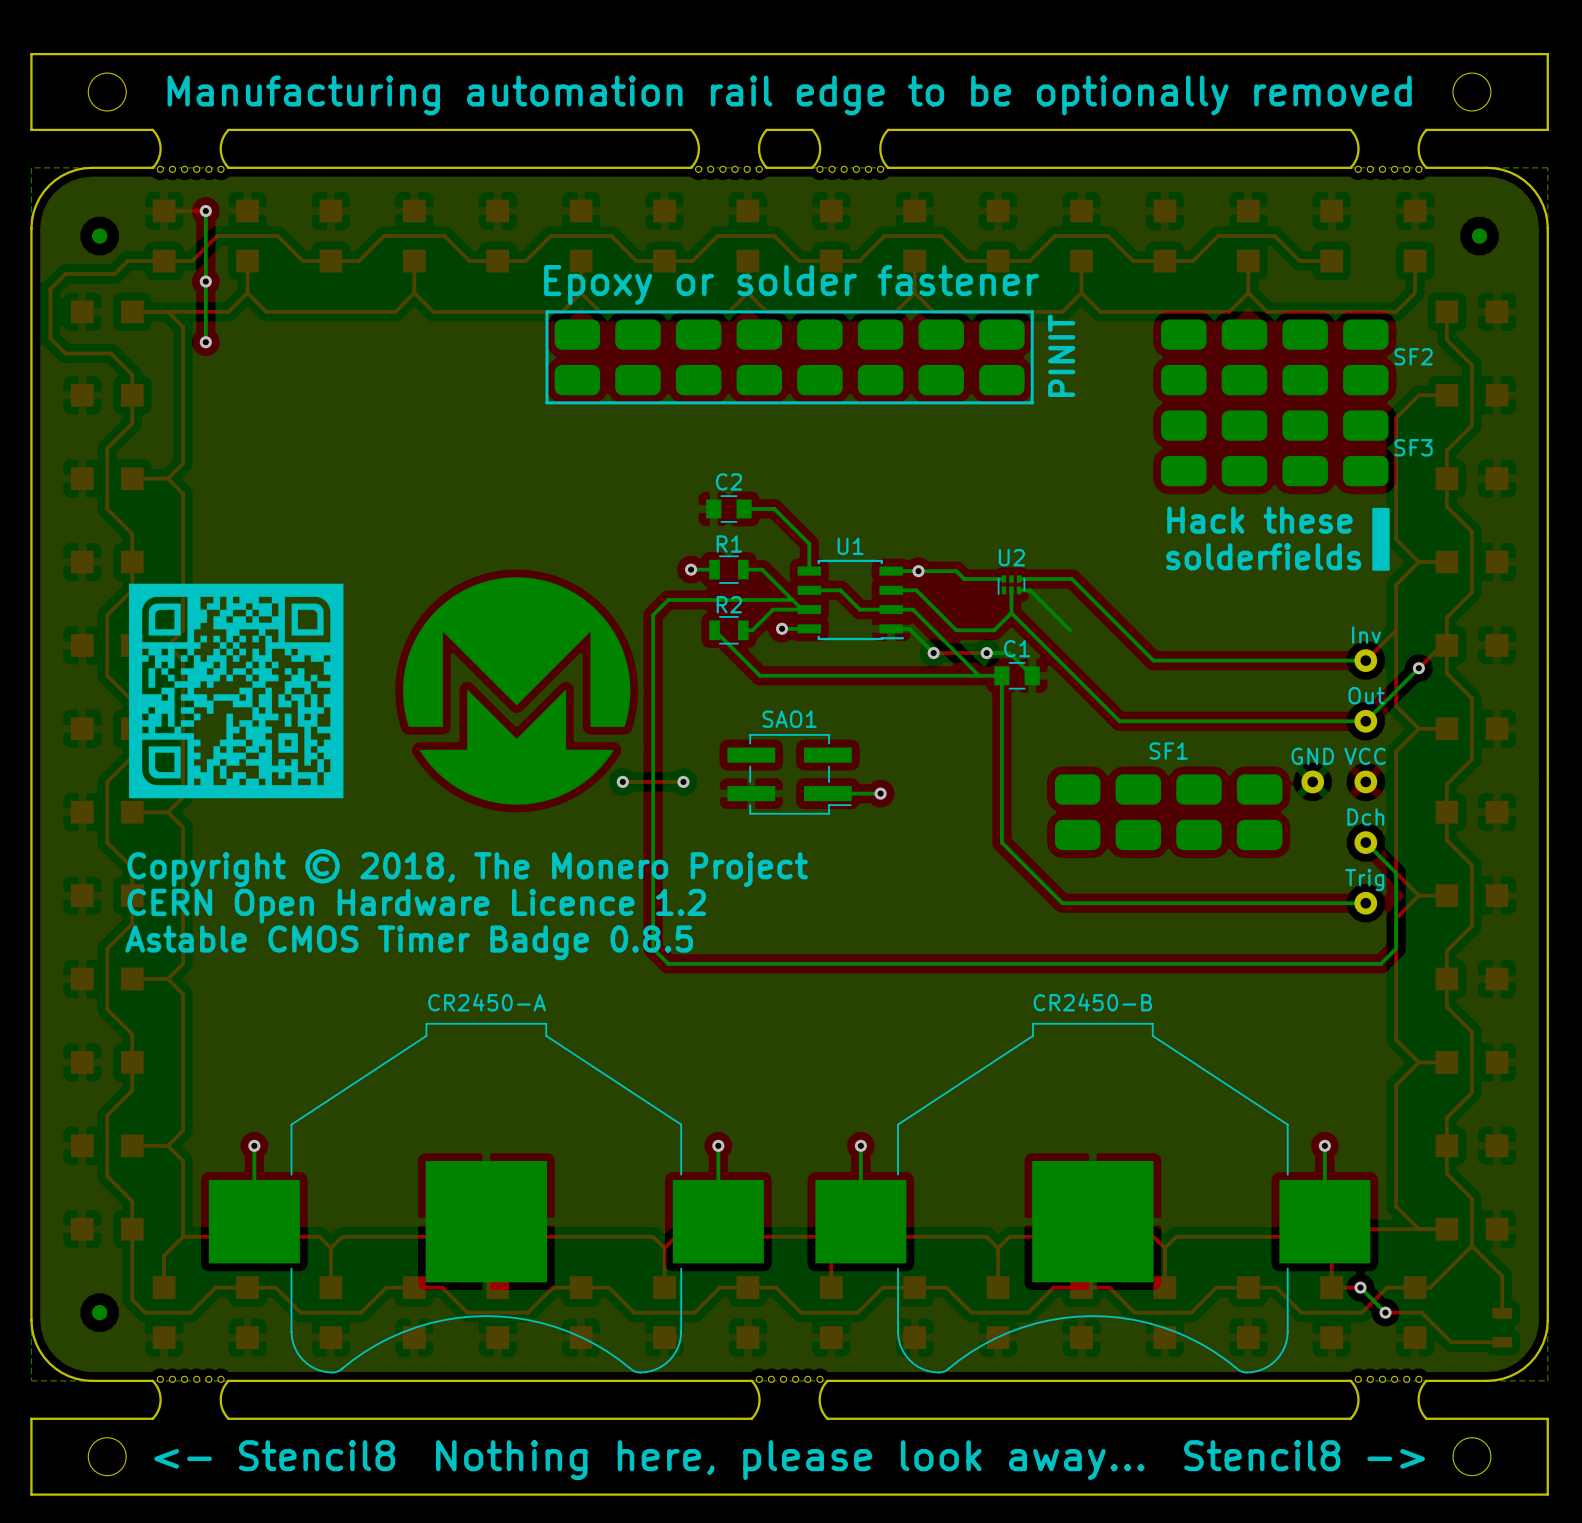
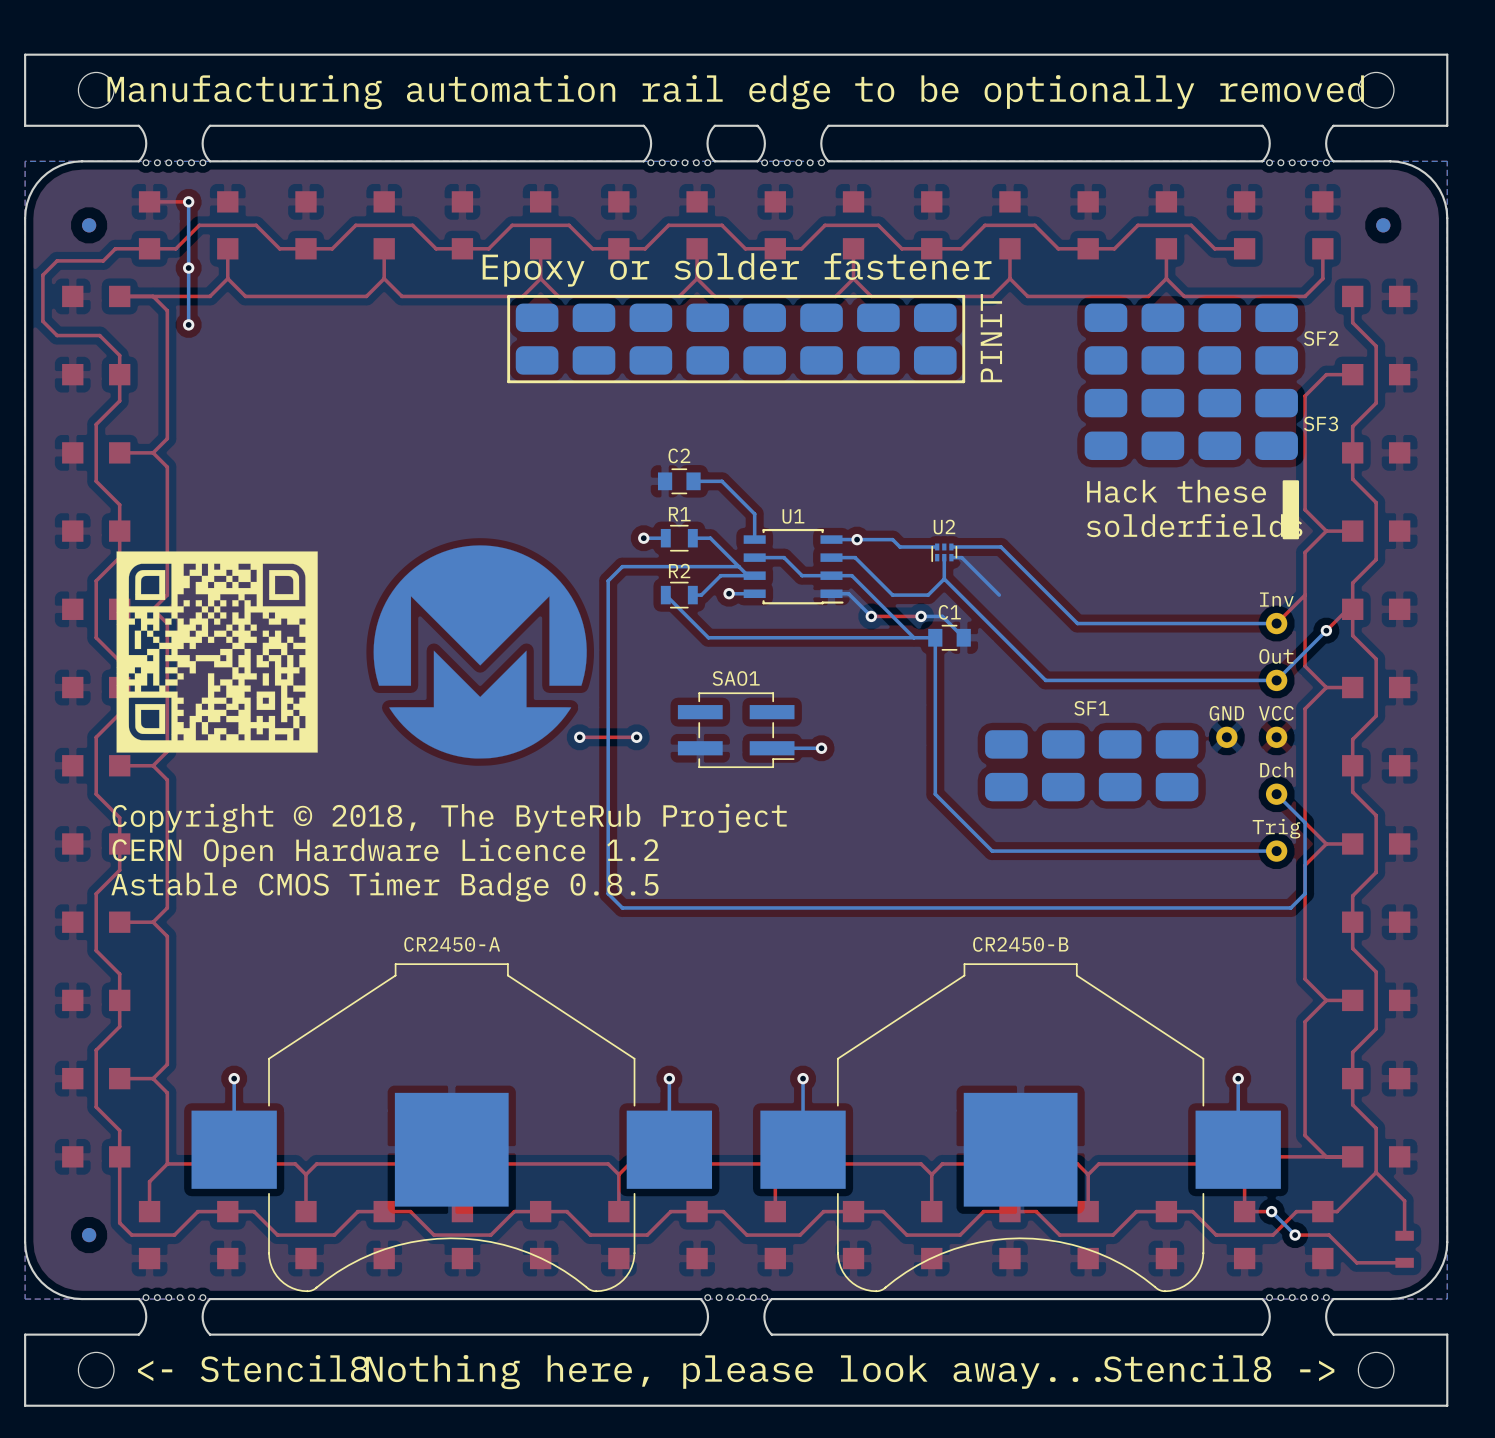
text: Copyright © 2018, The Monero Project (467, 867) -> Copyright © 2018, The ByteRub Project (449, 818)

